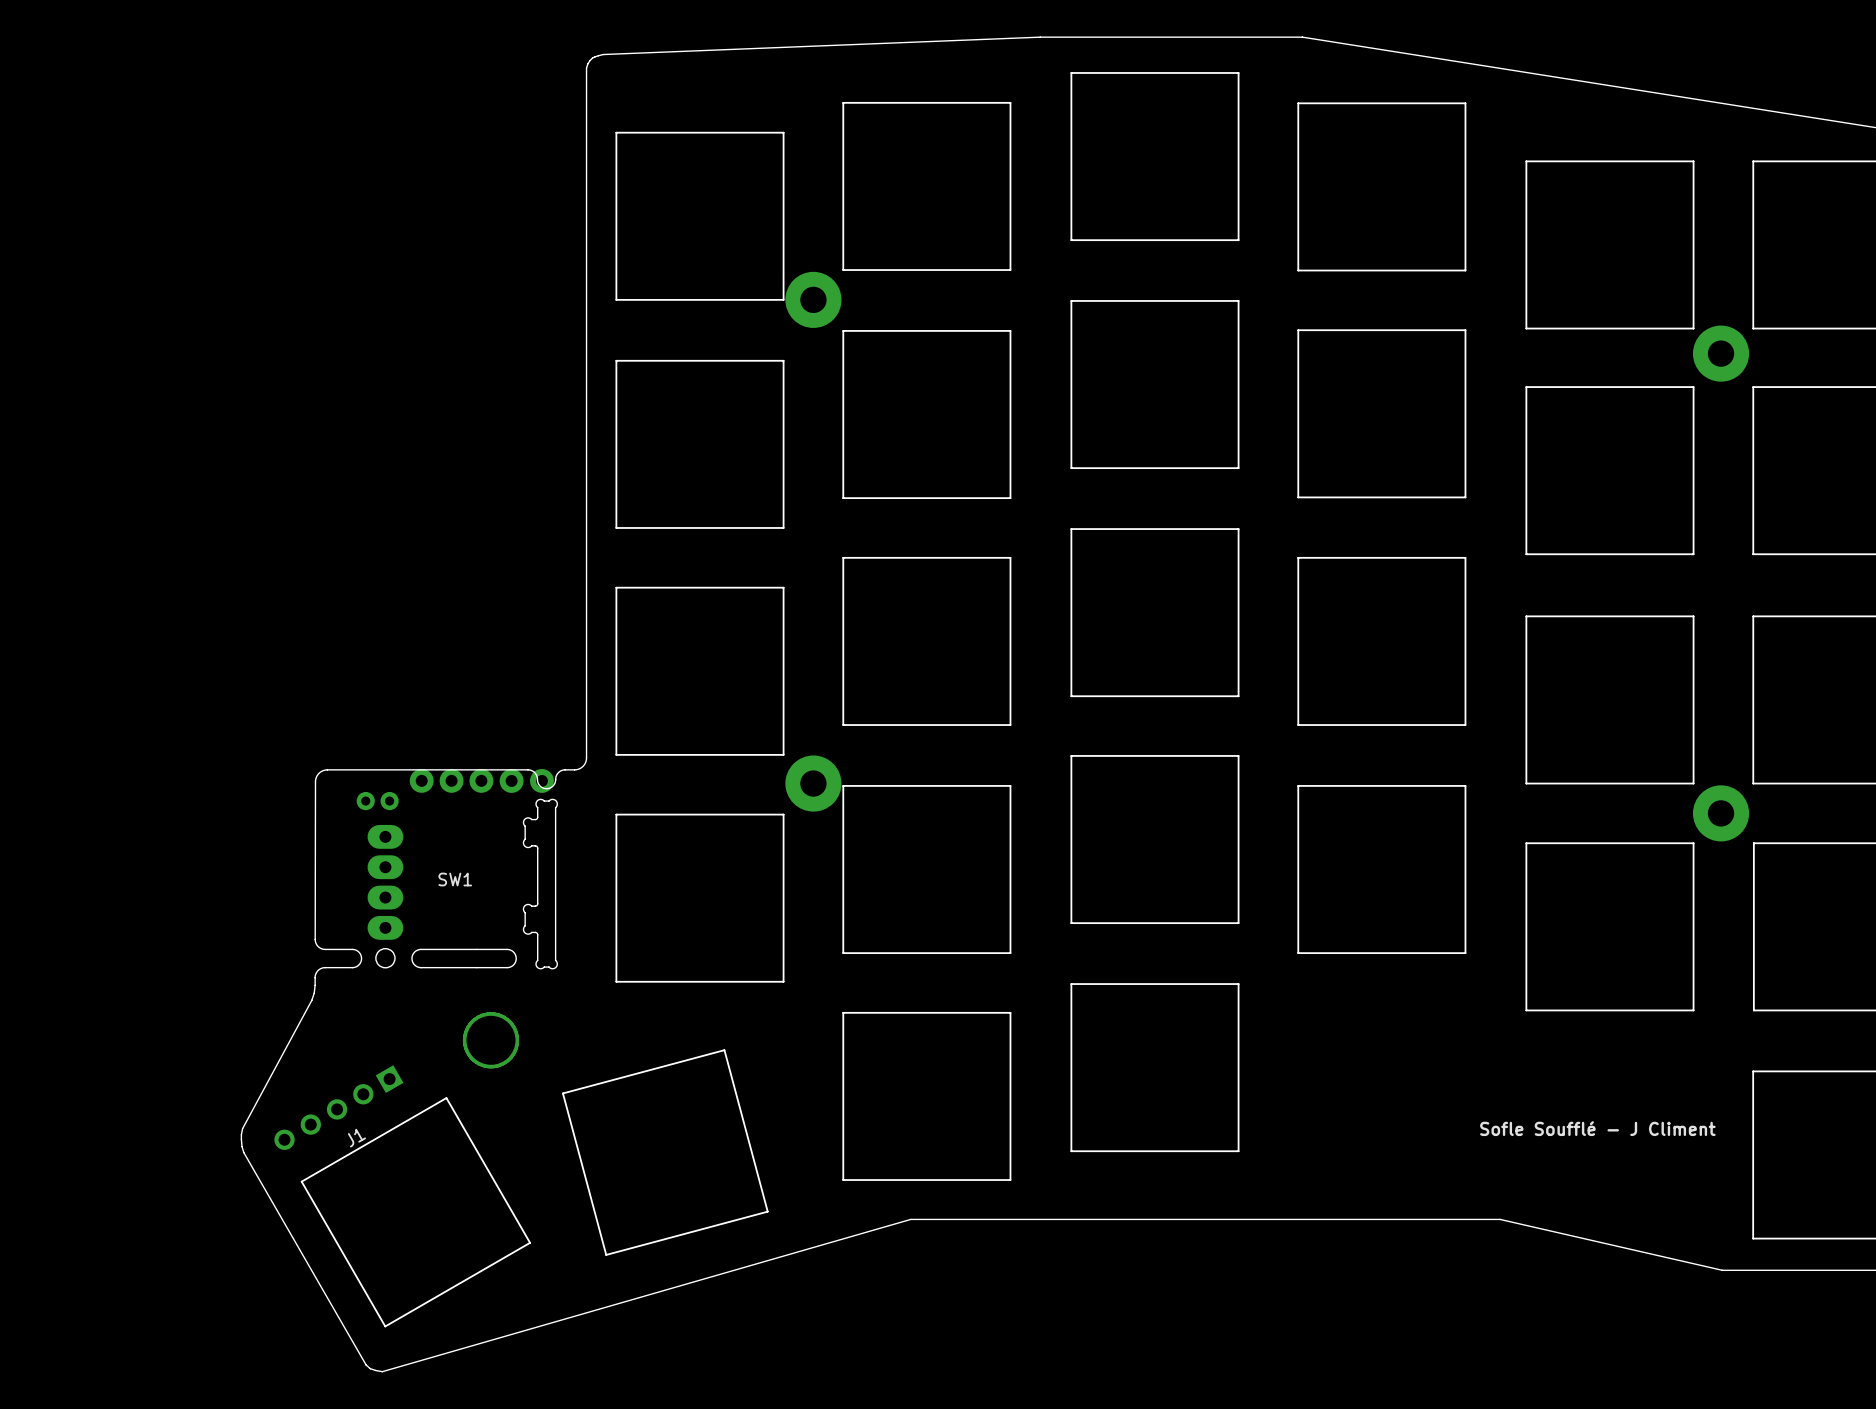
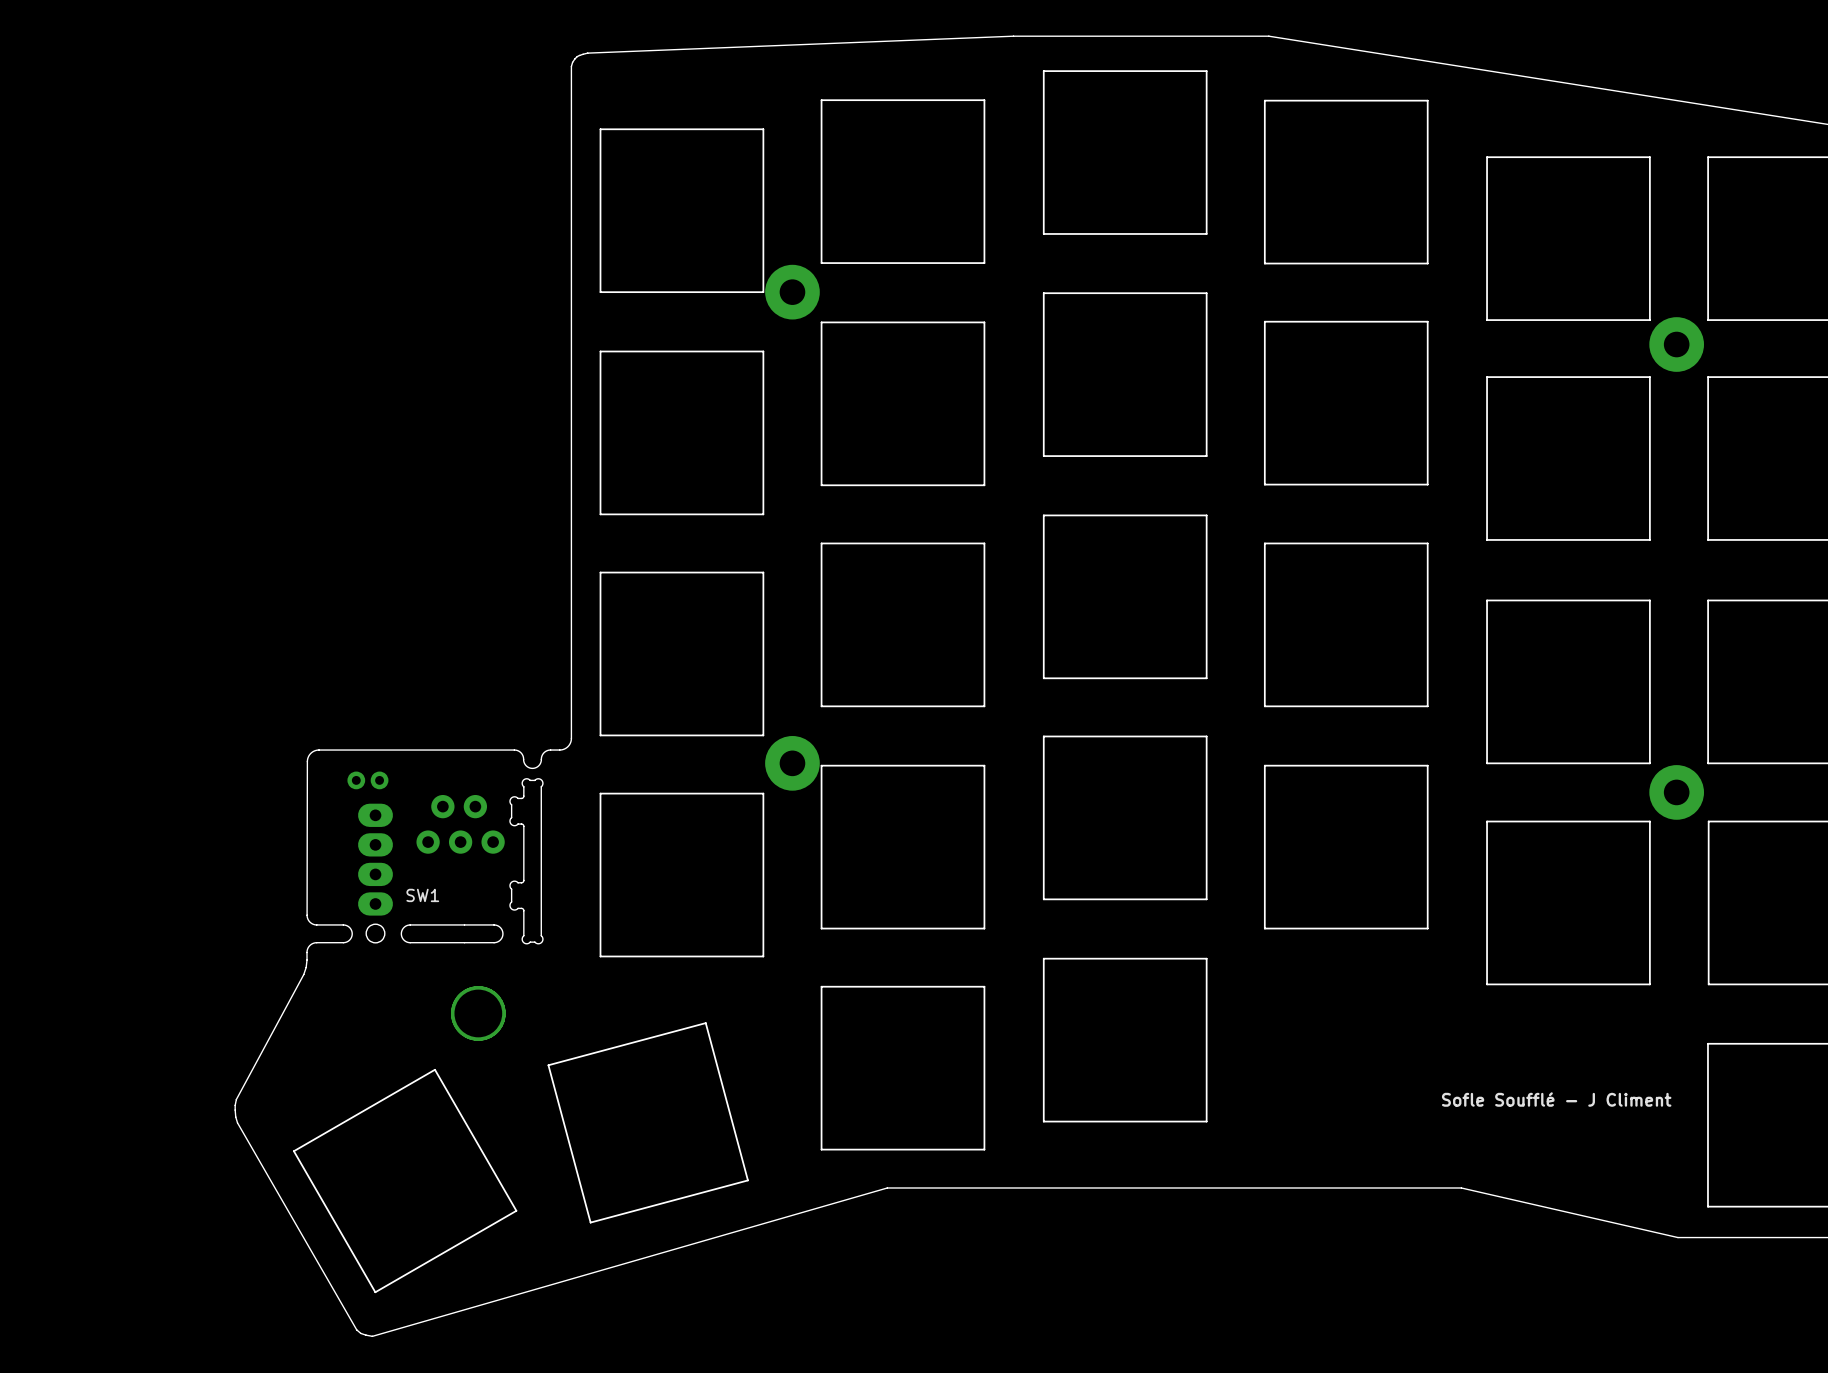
part: (421, 780) -> none
part: (451, 780) -> none
part: (481, 780) -> none
part: (511, 780) -> none
part: (541, 780) -> none
part: none -> (442, 806)
part: none -> (475, 806)
part: none -> (428, 842)
part: none -> (460, 842)
part: none -> (493, 842)
SW1 name position: SW1 (455, 879) -> SW1 (422, 895)
J1: (338, 1107) -> none

